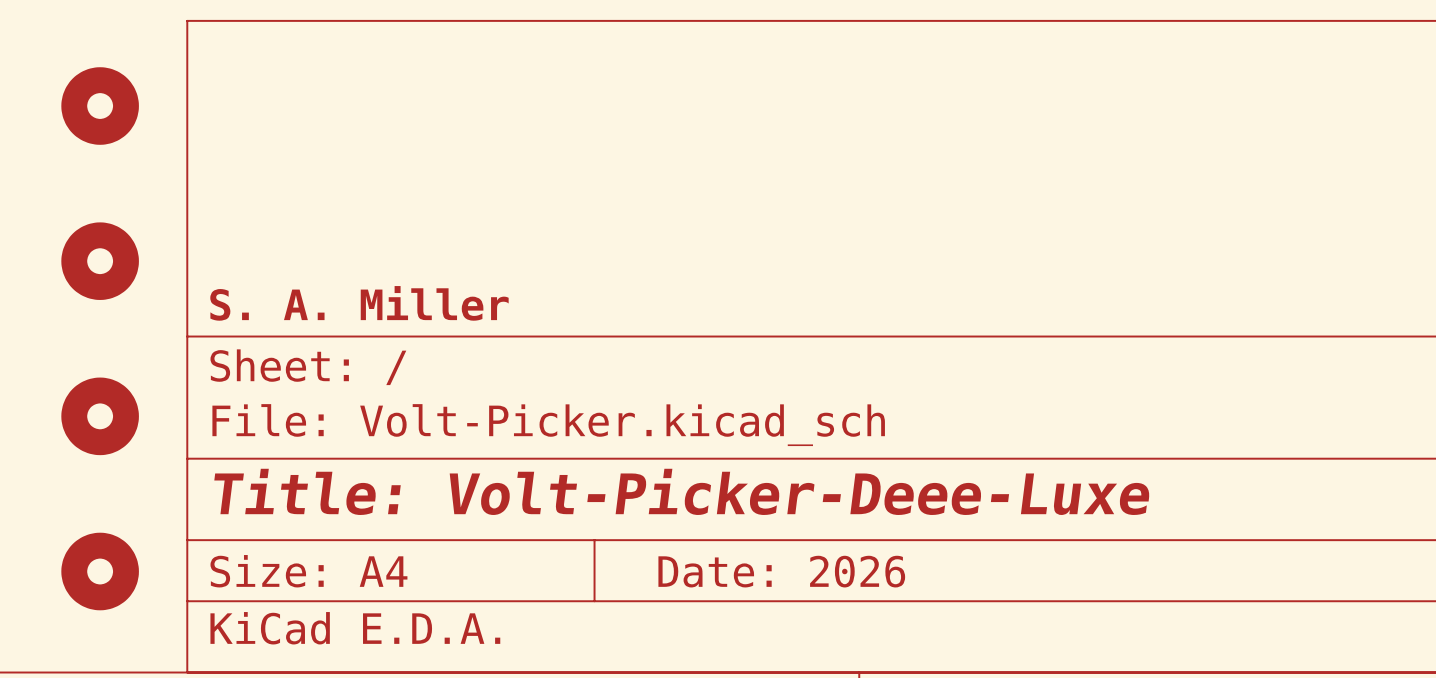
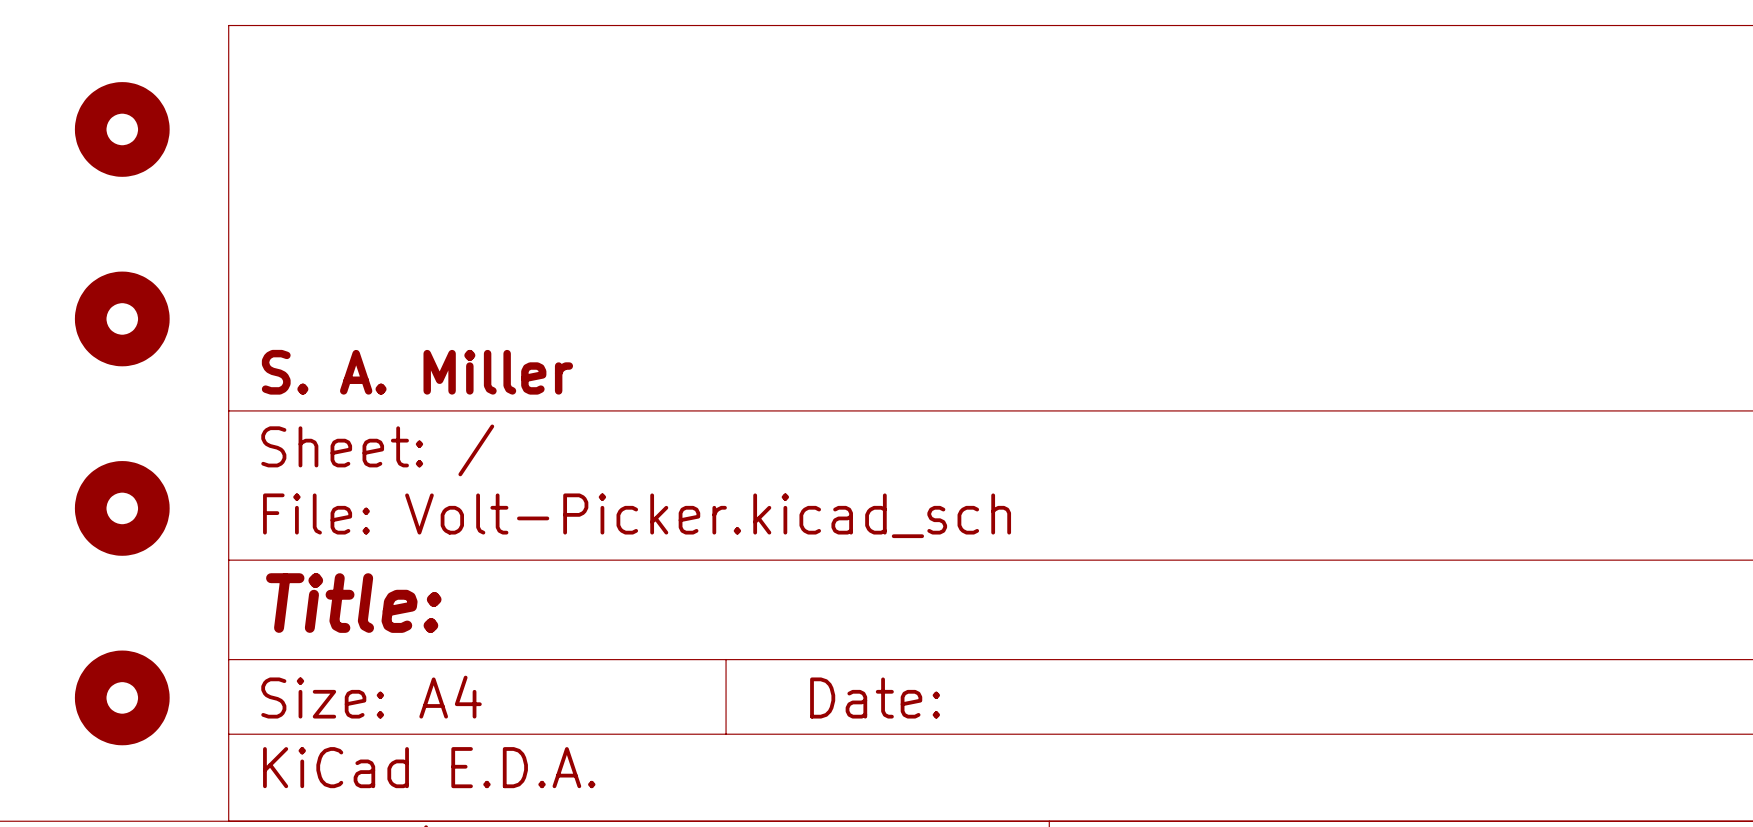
title block: Title: Volt-Picker-Deee-Luxe (682, 491) -> Title: (353, 603)
title block: Date: 2026 (781, 571) -> Date: (875, 698)

